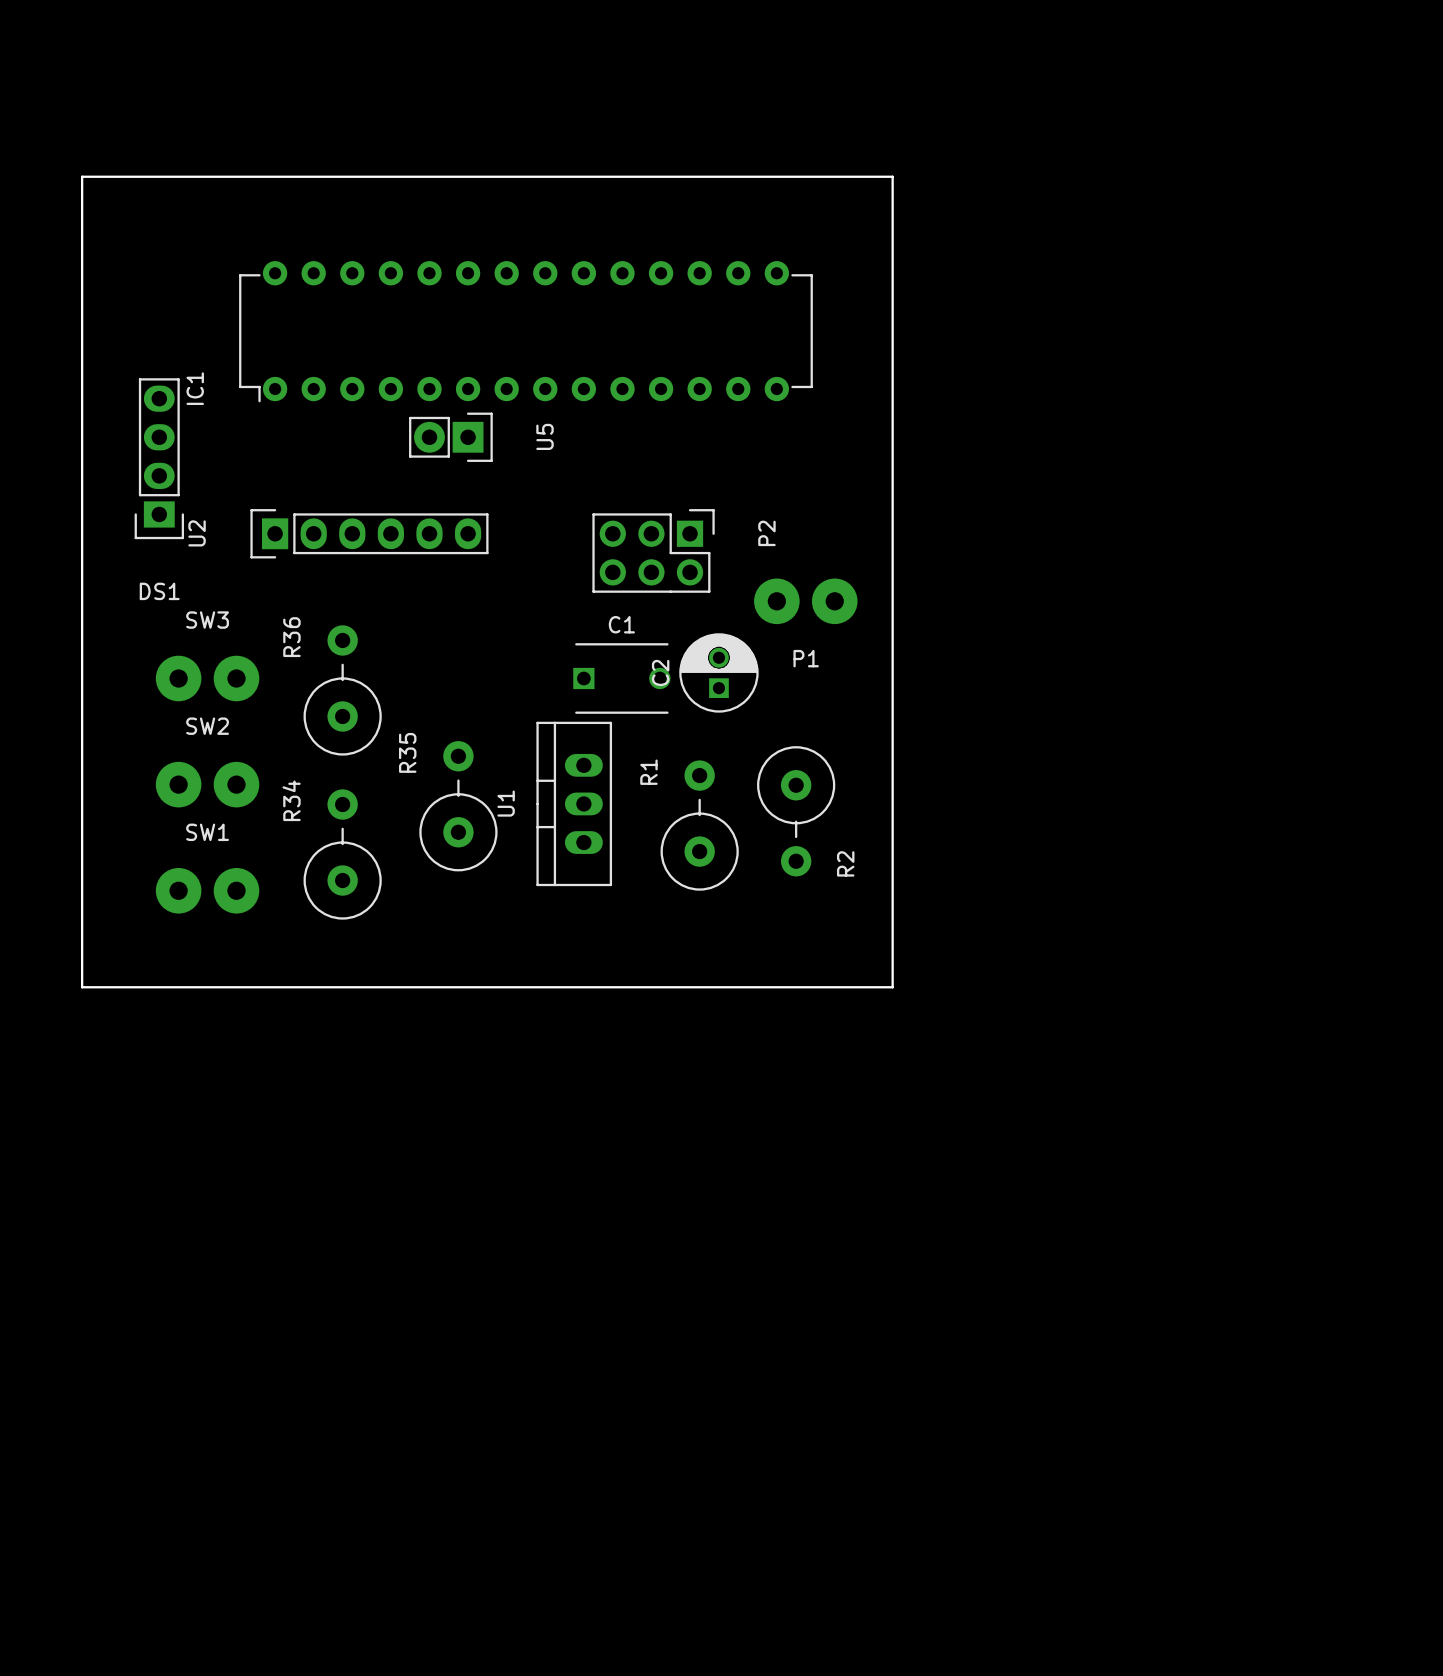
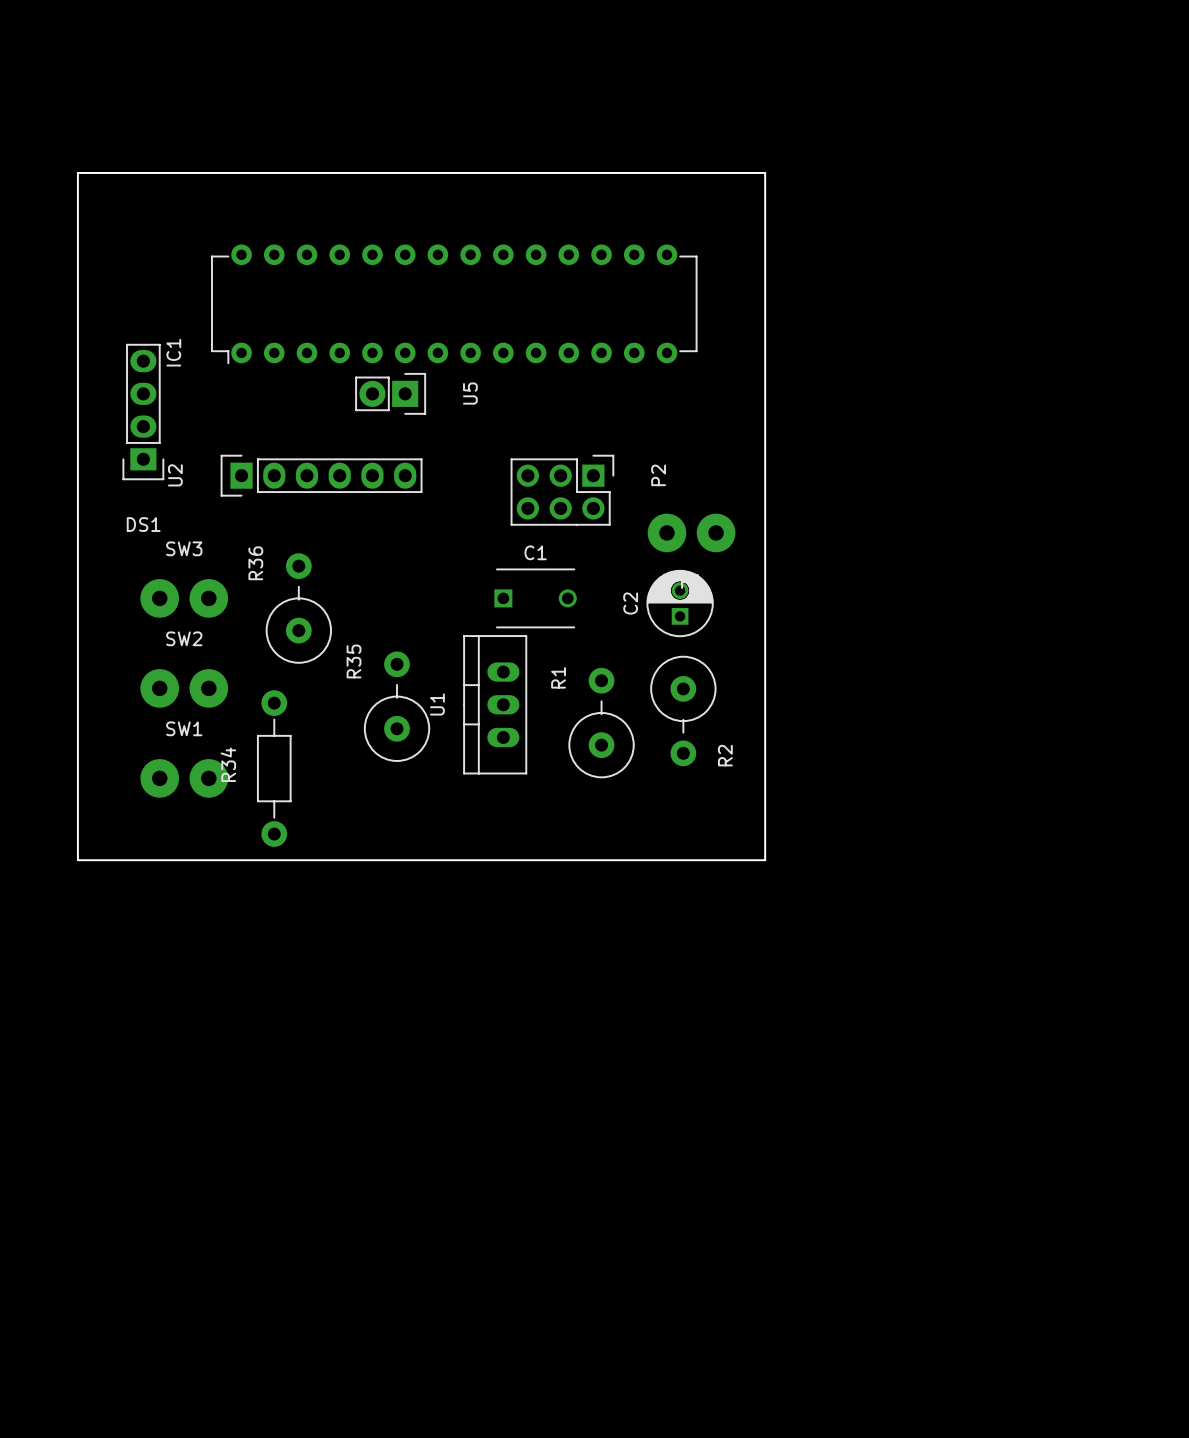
C2 position: (718, 672) -> (680, 603)
R34 footprint: [303, 789, 382, 920] -> [256, 690, 292, 847]
R34 name position: R34 (291, 800) -> R34 (228, 764)

